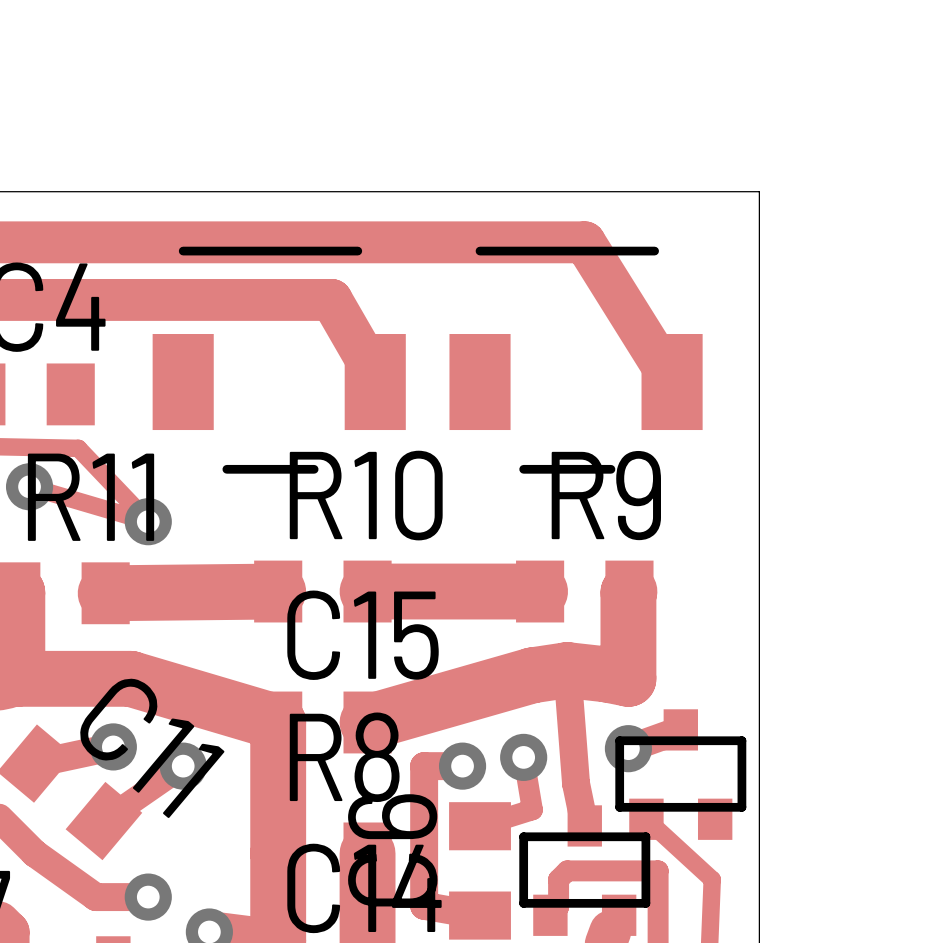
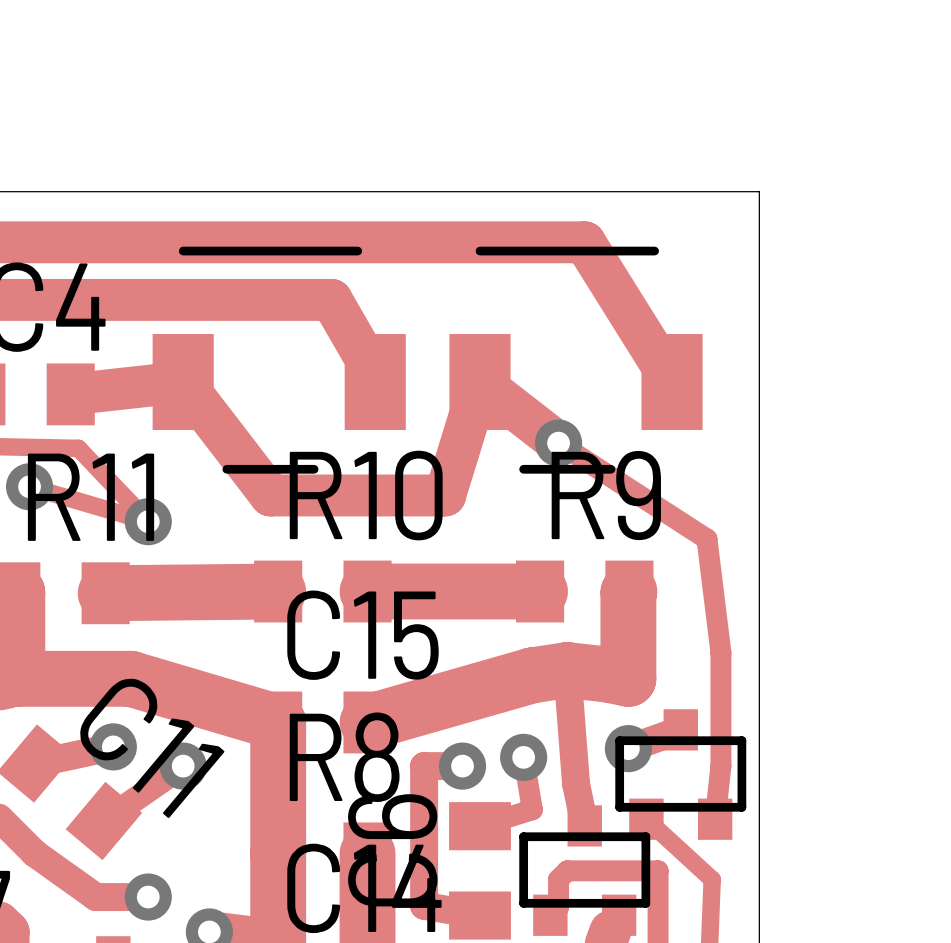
track: none -> (70, 394) (183, 381) (270, 495) (445, 495) (479, 381) (558, 443) (706, 539) (720, 652) (720, 766) (715, 819)
via: none -> (558, 443)

